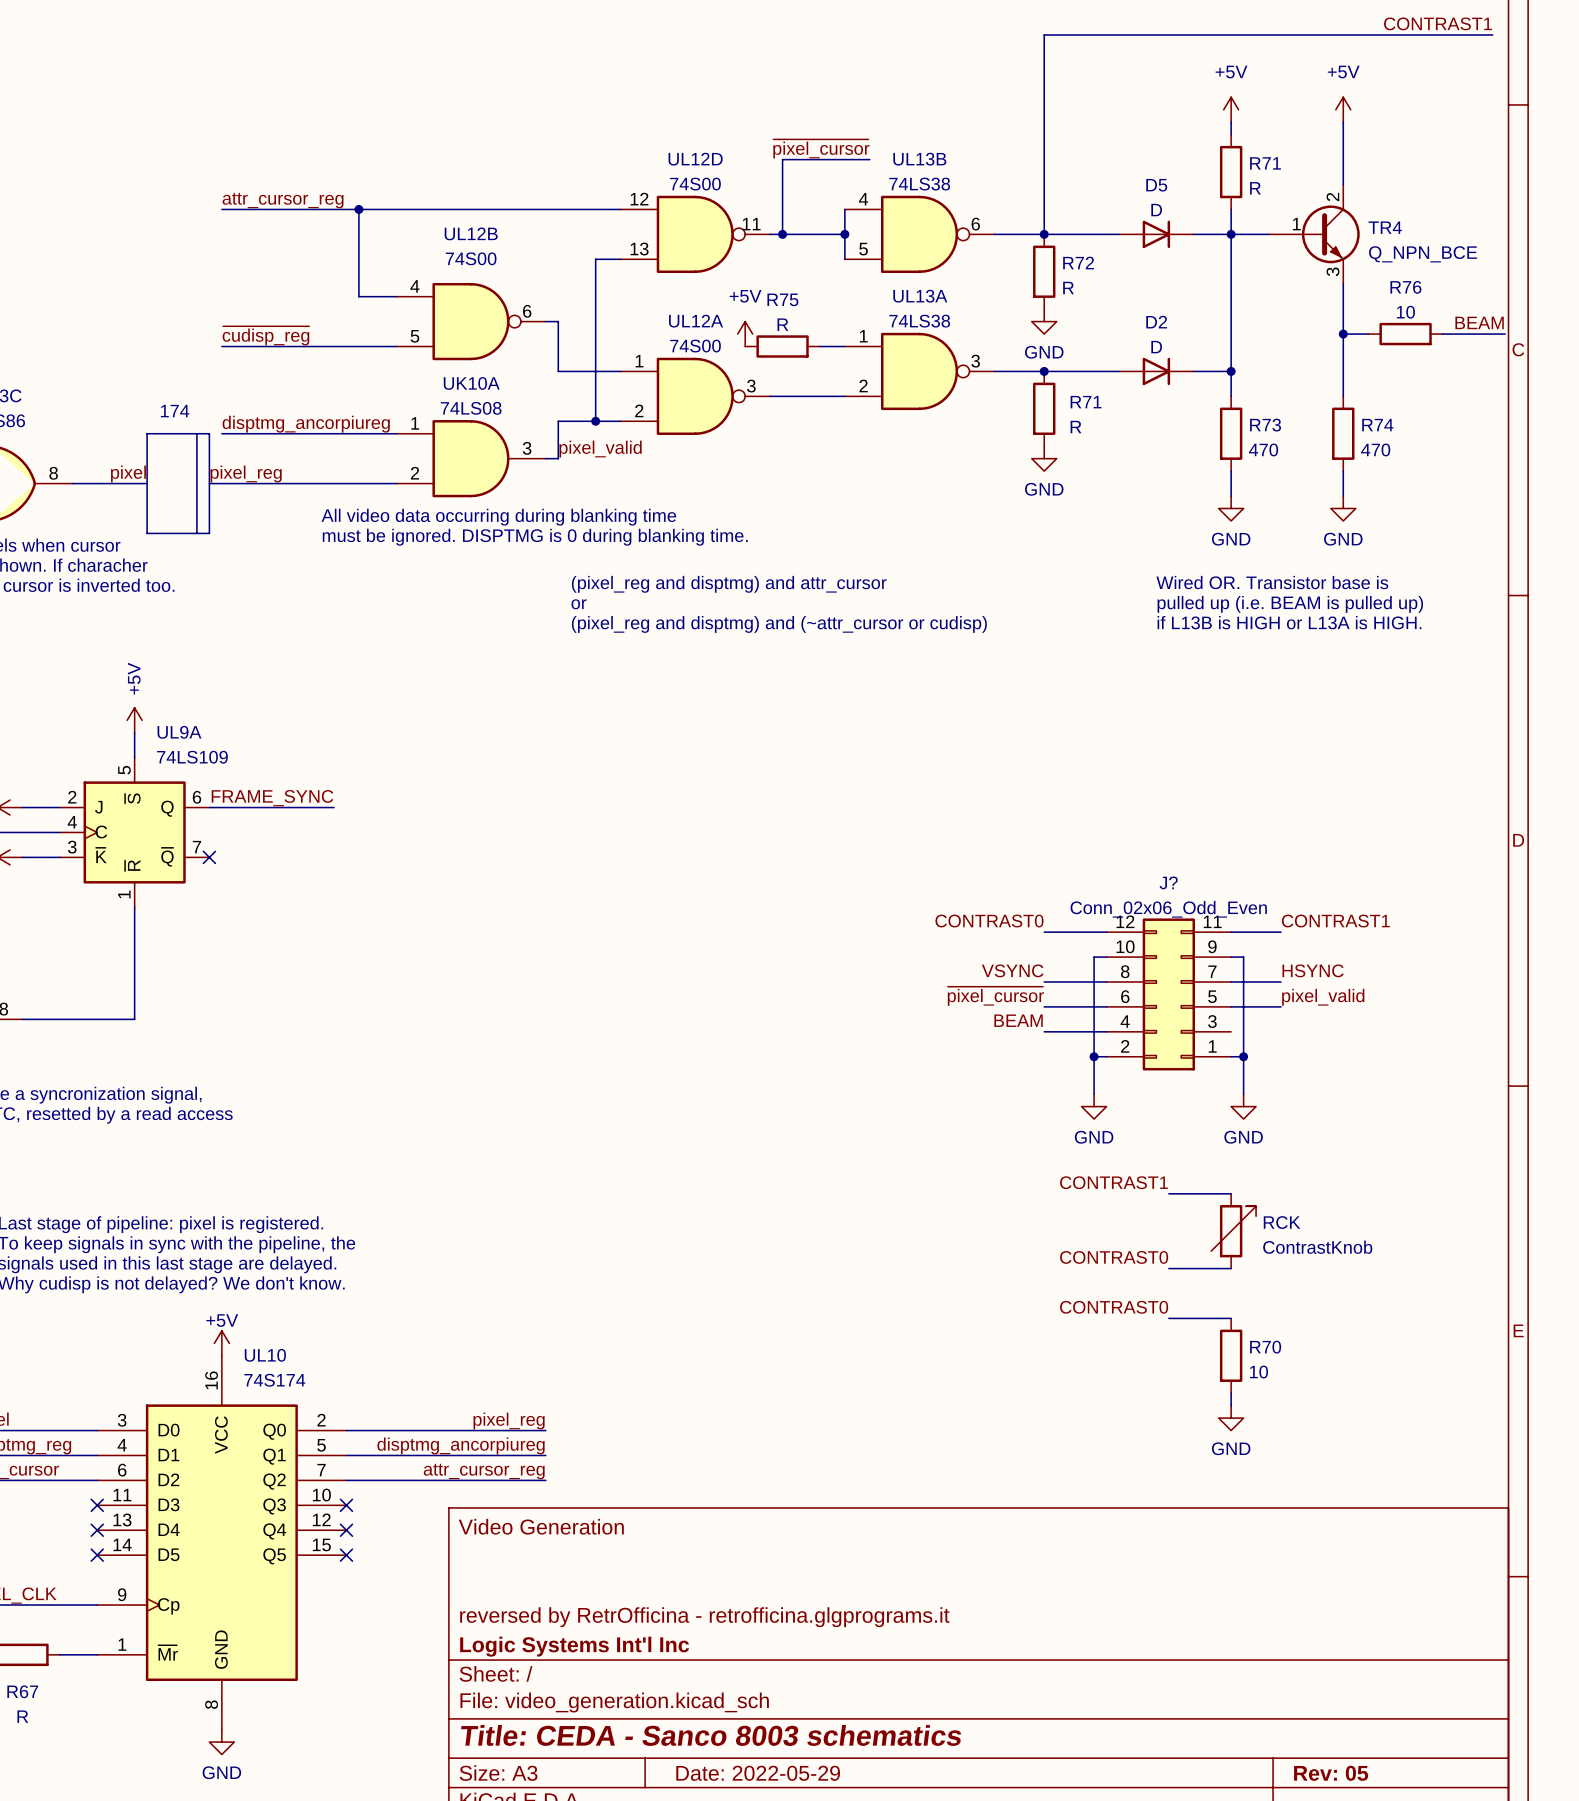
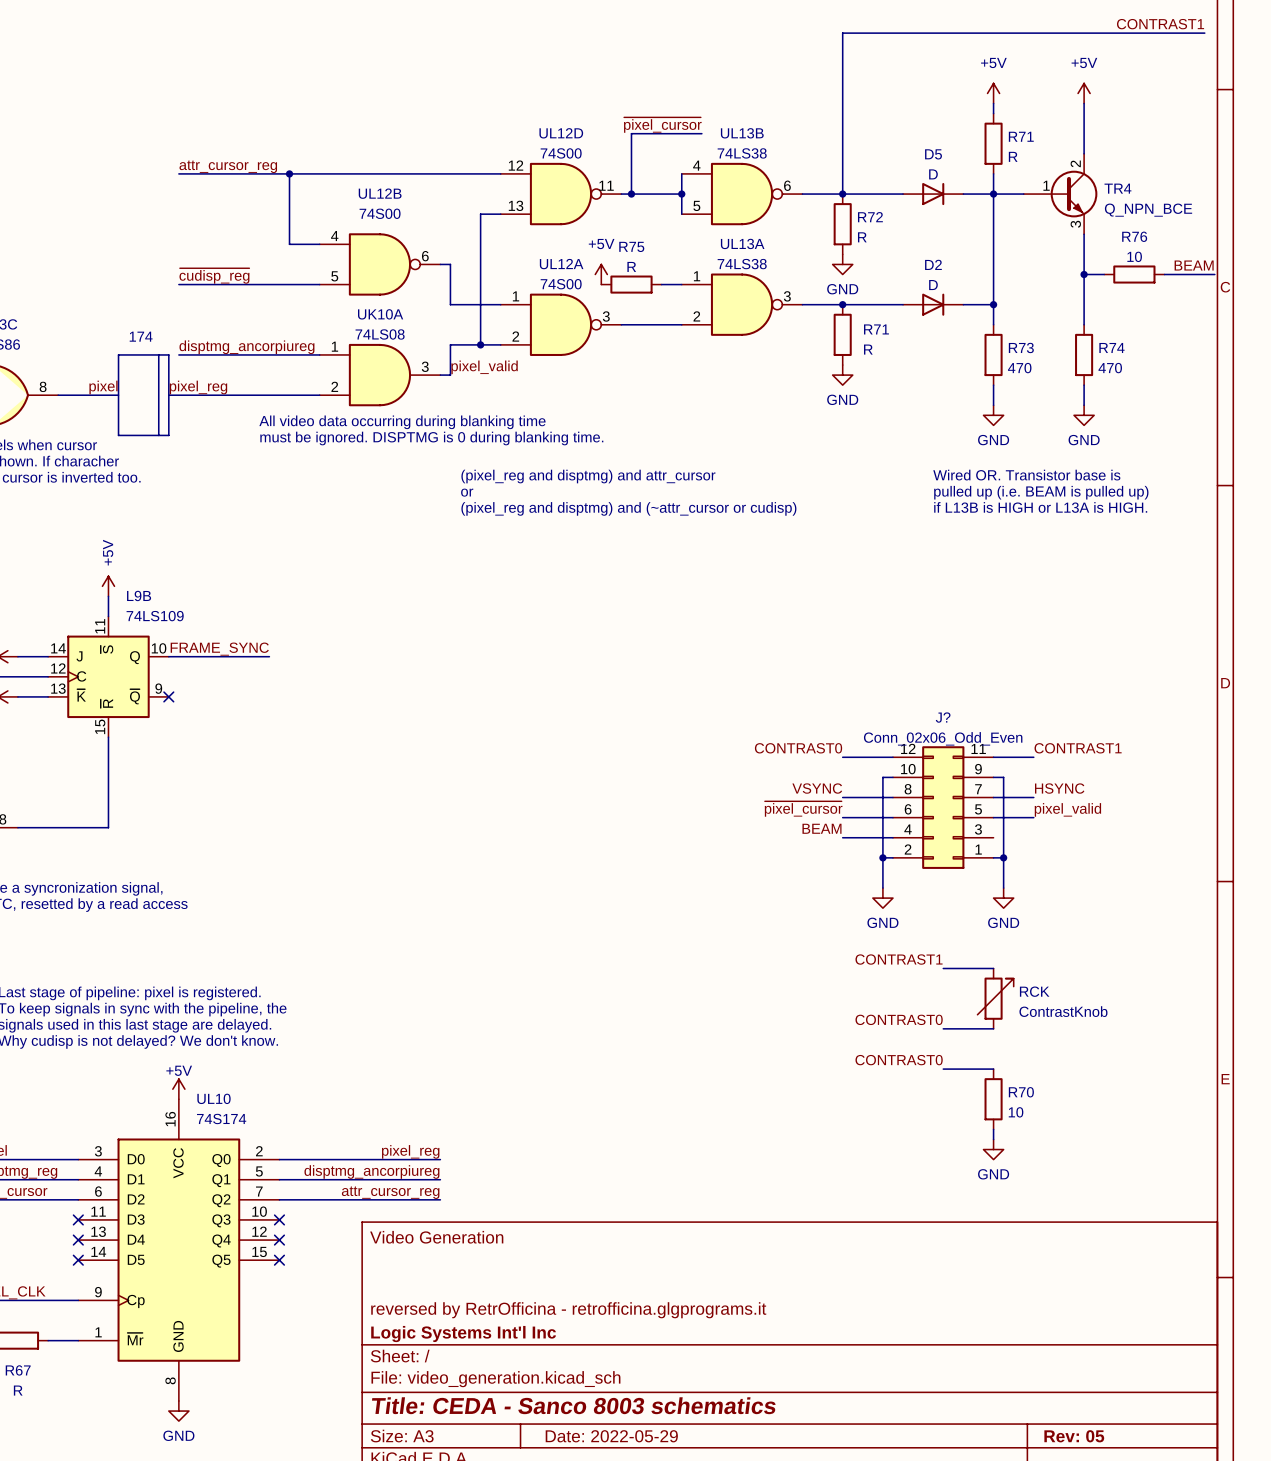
UL9A name: UL9A (179, 732) -> L9B (139, 595)
UL9A pin number: 5 (124, 770) -> 11 (100, 626)
UL9A pin number: 2 (72, 797) -> 14 (58, 648)
UL9A pin number: 6 (197, 797) -> 10 (159, 648)
UL9A pin number: 4 (72, 822) -> 12 (58, 668)
UL9A pin number: 3 (72, 847) -> 13 (58, 688)
UL9A pin number: 7 (196, 847) -> 9 (158, 688)
UL9A pin number: 1 (124, 894) -> 15 (100, 726)

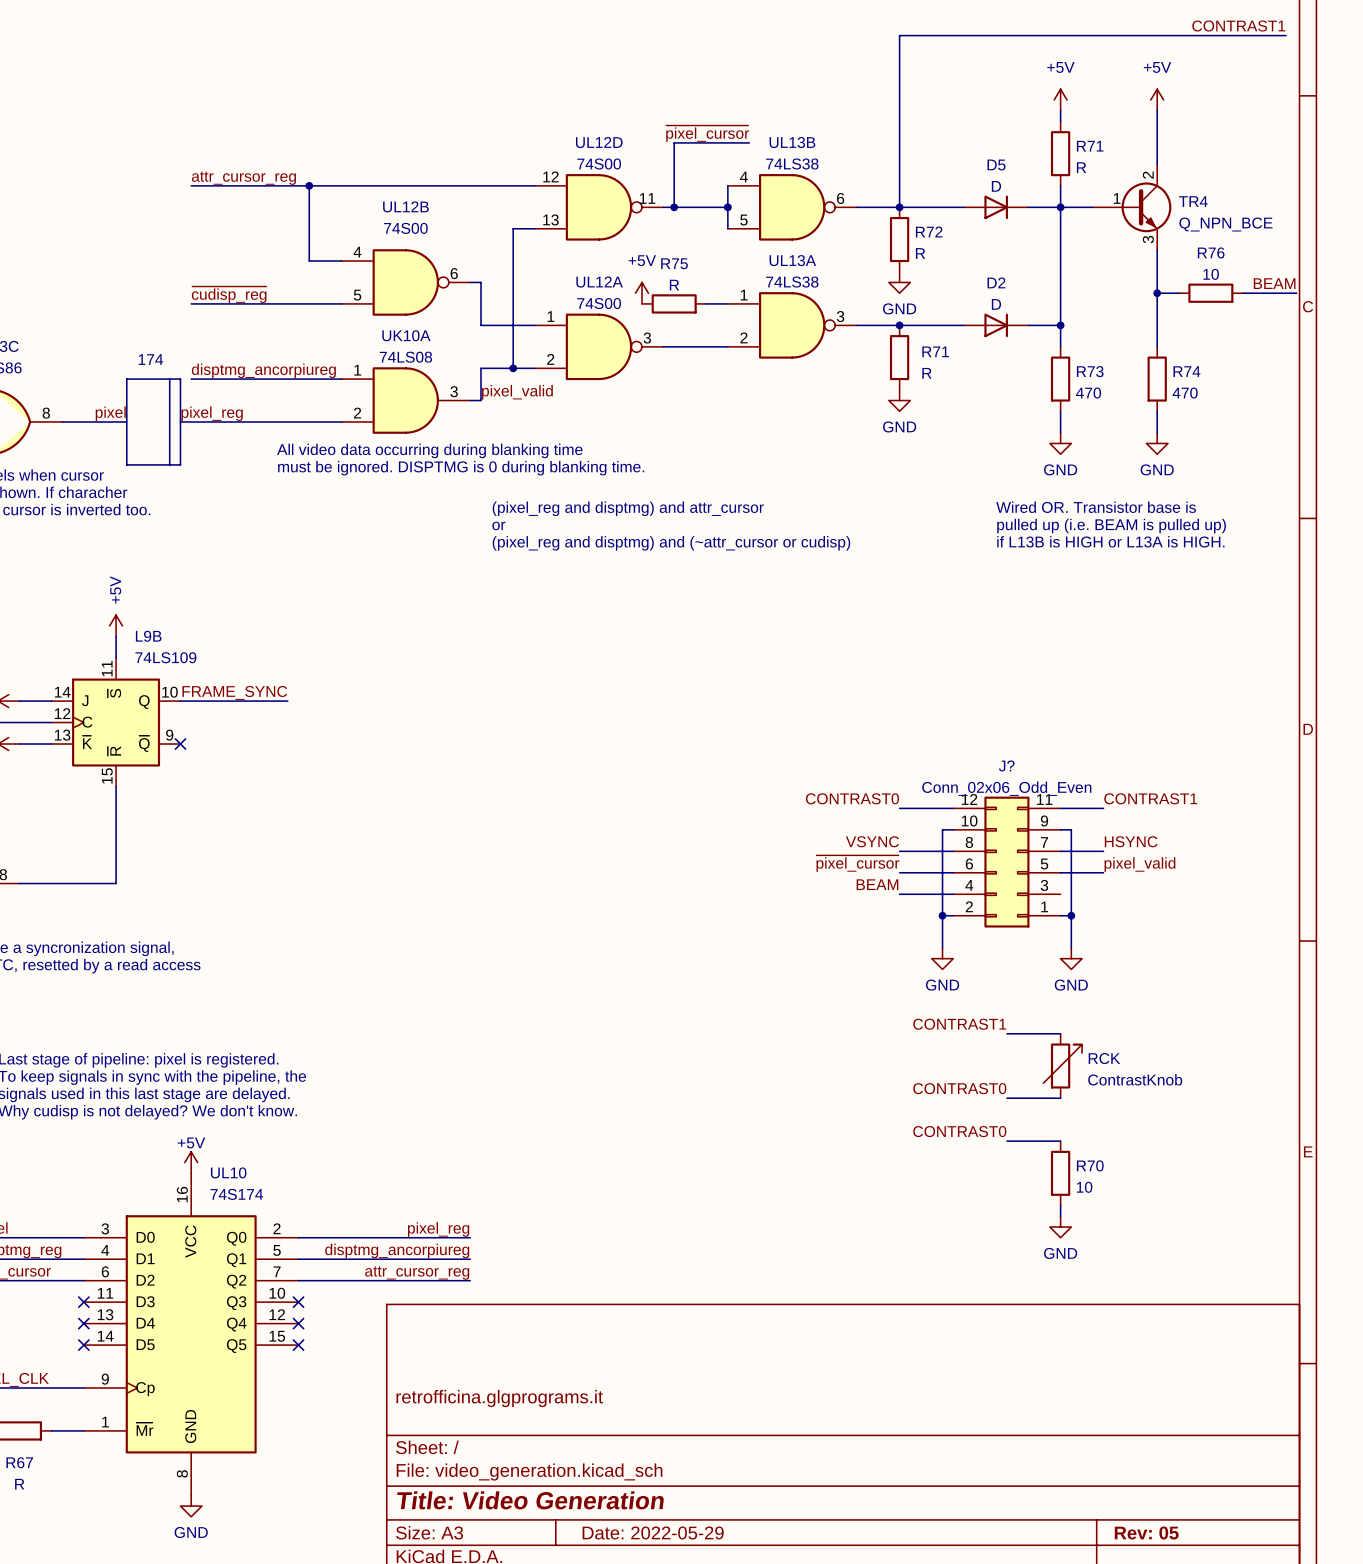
title block: Video Generation (436, 1237) -> none
title block: reversed by RetrOfficina - retrofficina.glgprograms.it (568, 1310) -> retrofficina.glgprograms.it (499, 1398)
title block: Logic Systems Int'l Inc (463, 1334) -> none
title block: Title: CEDA - Sanco 8003 schematics (573, 1405) -> Title: Video Generation (530, 1500)

